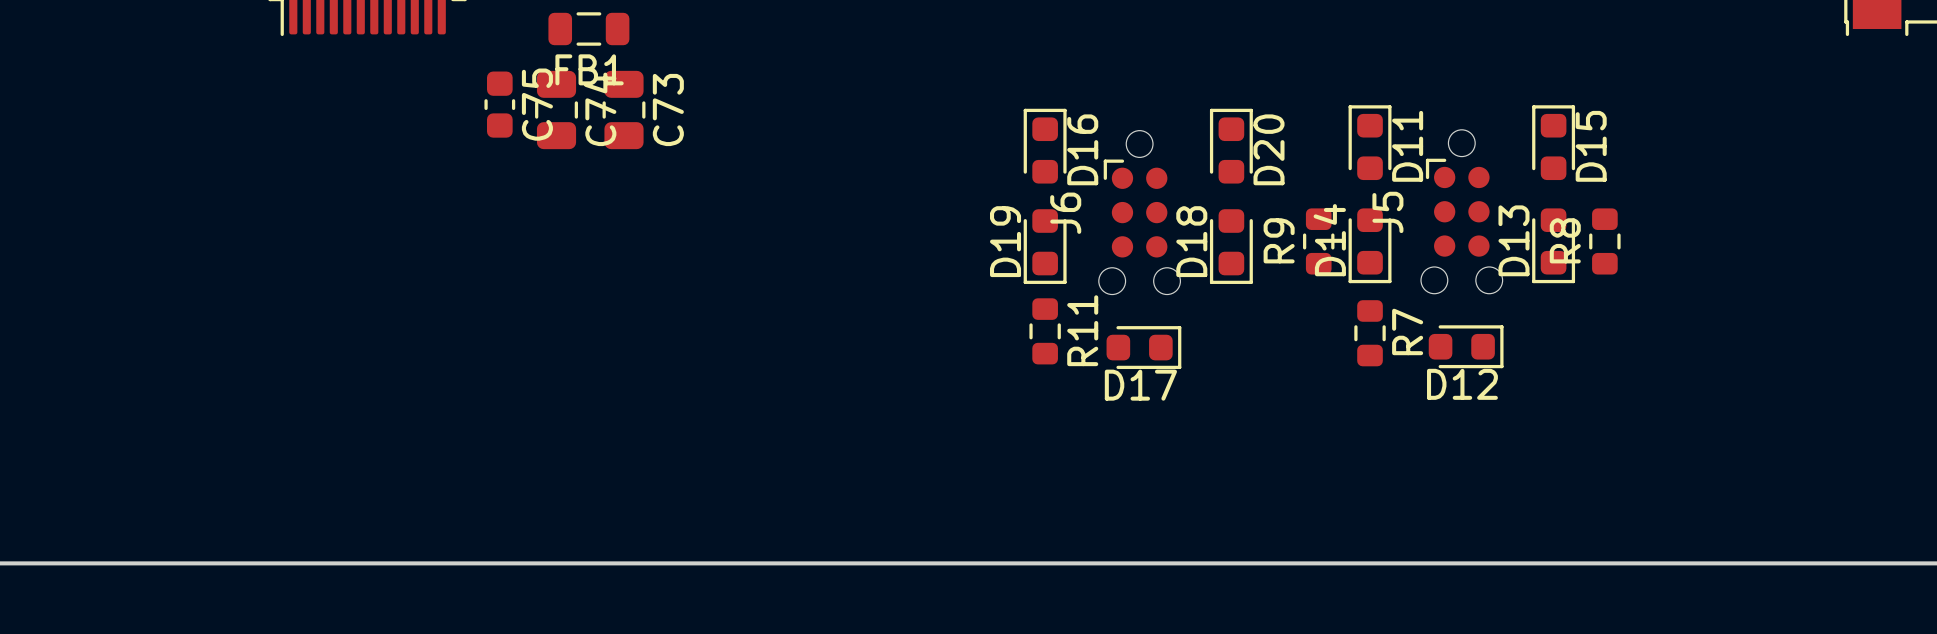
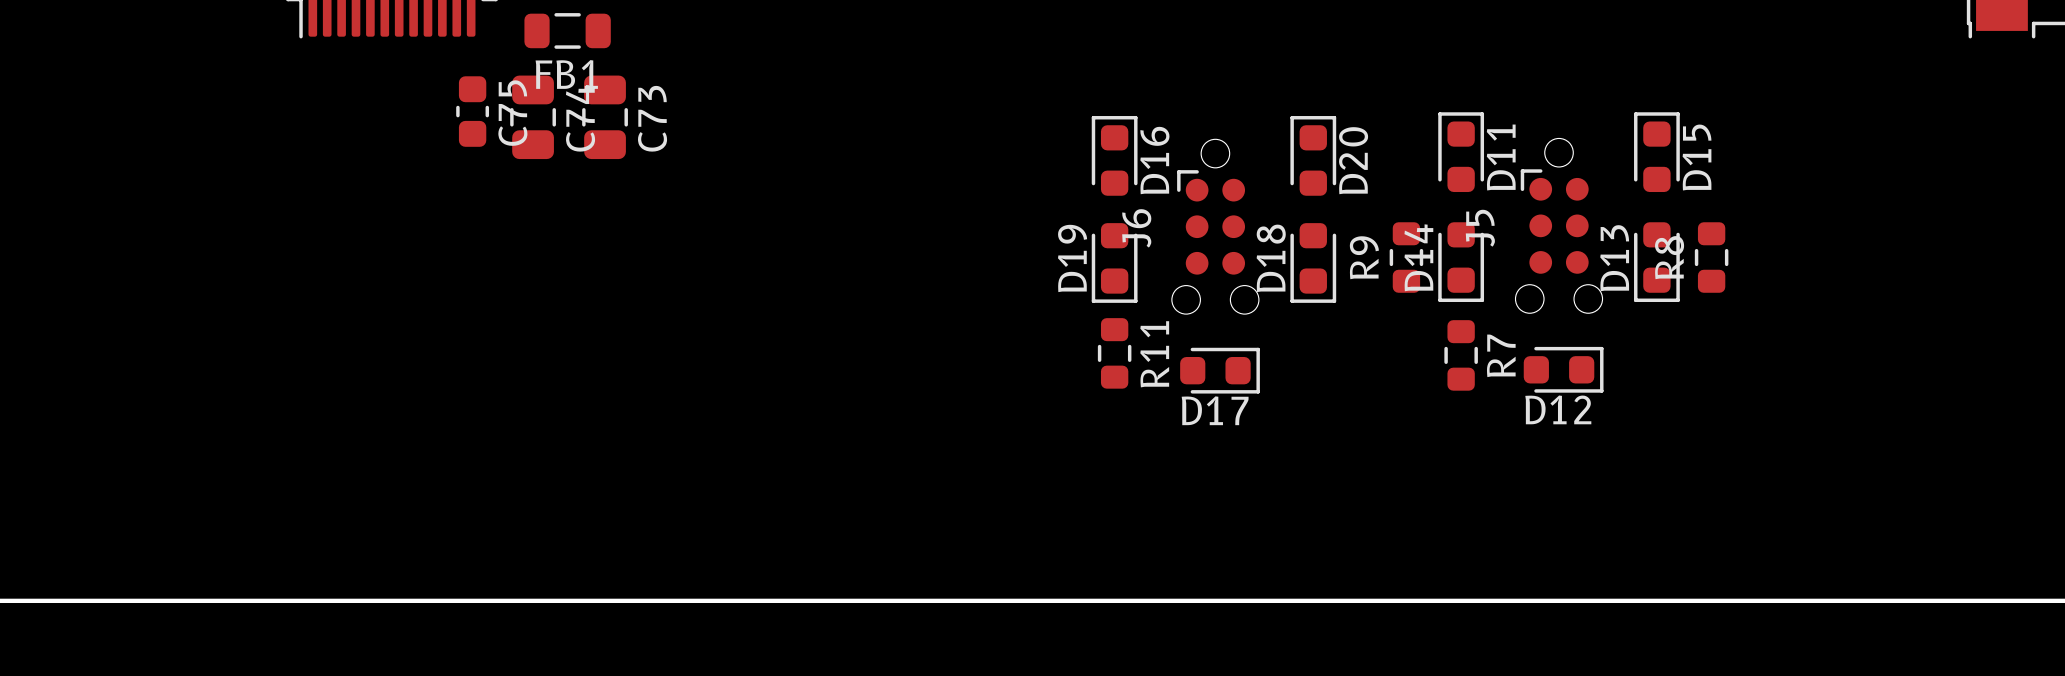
FB1 position: (588, 29) -> (567, 30)
C75 position: (499, 104) -> (472, 111)
C74 position: (556, 109) -> (533, 117)
C73 position: (624, 109) -> (605, 117)

